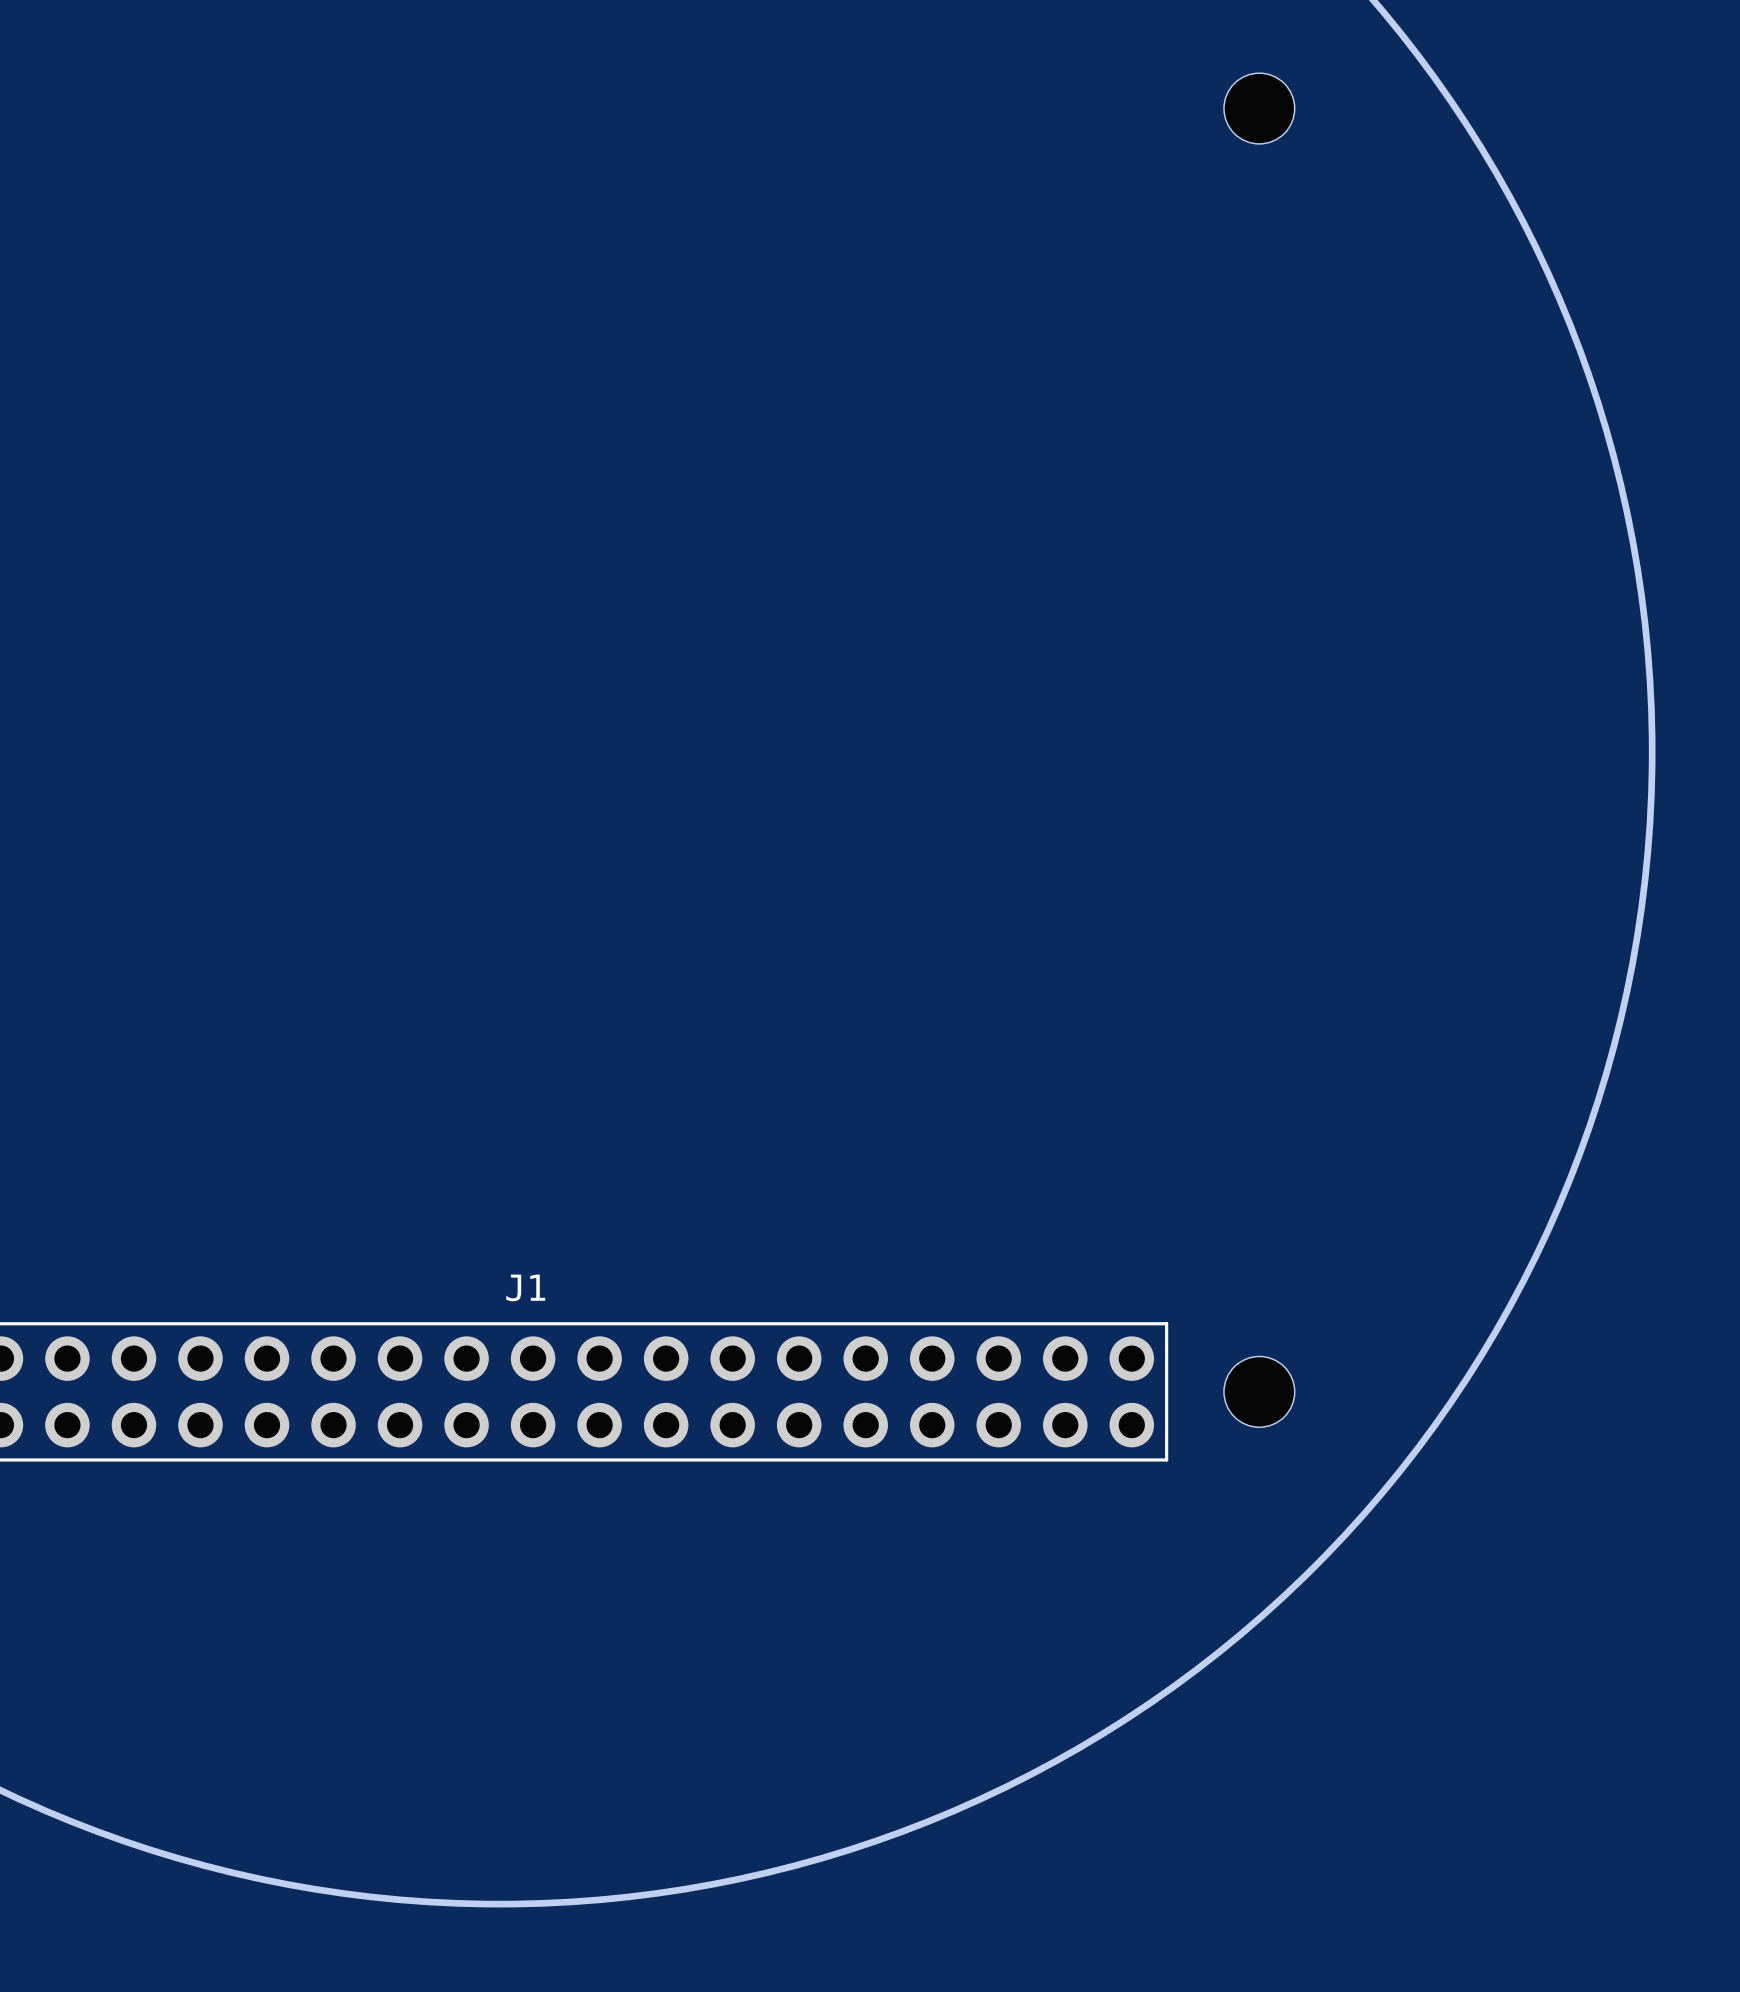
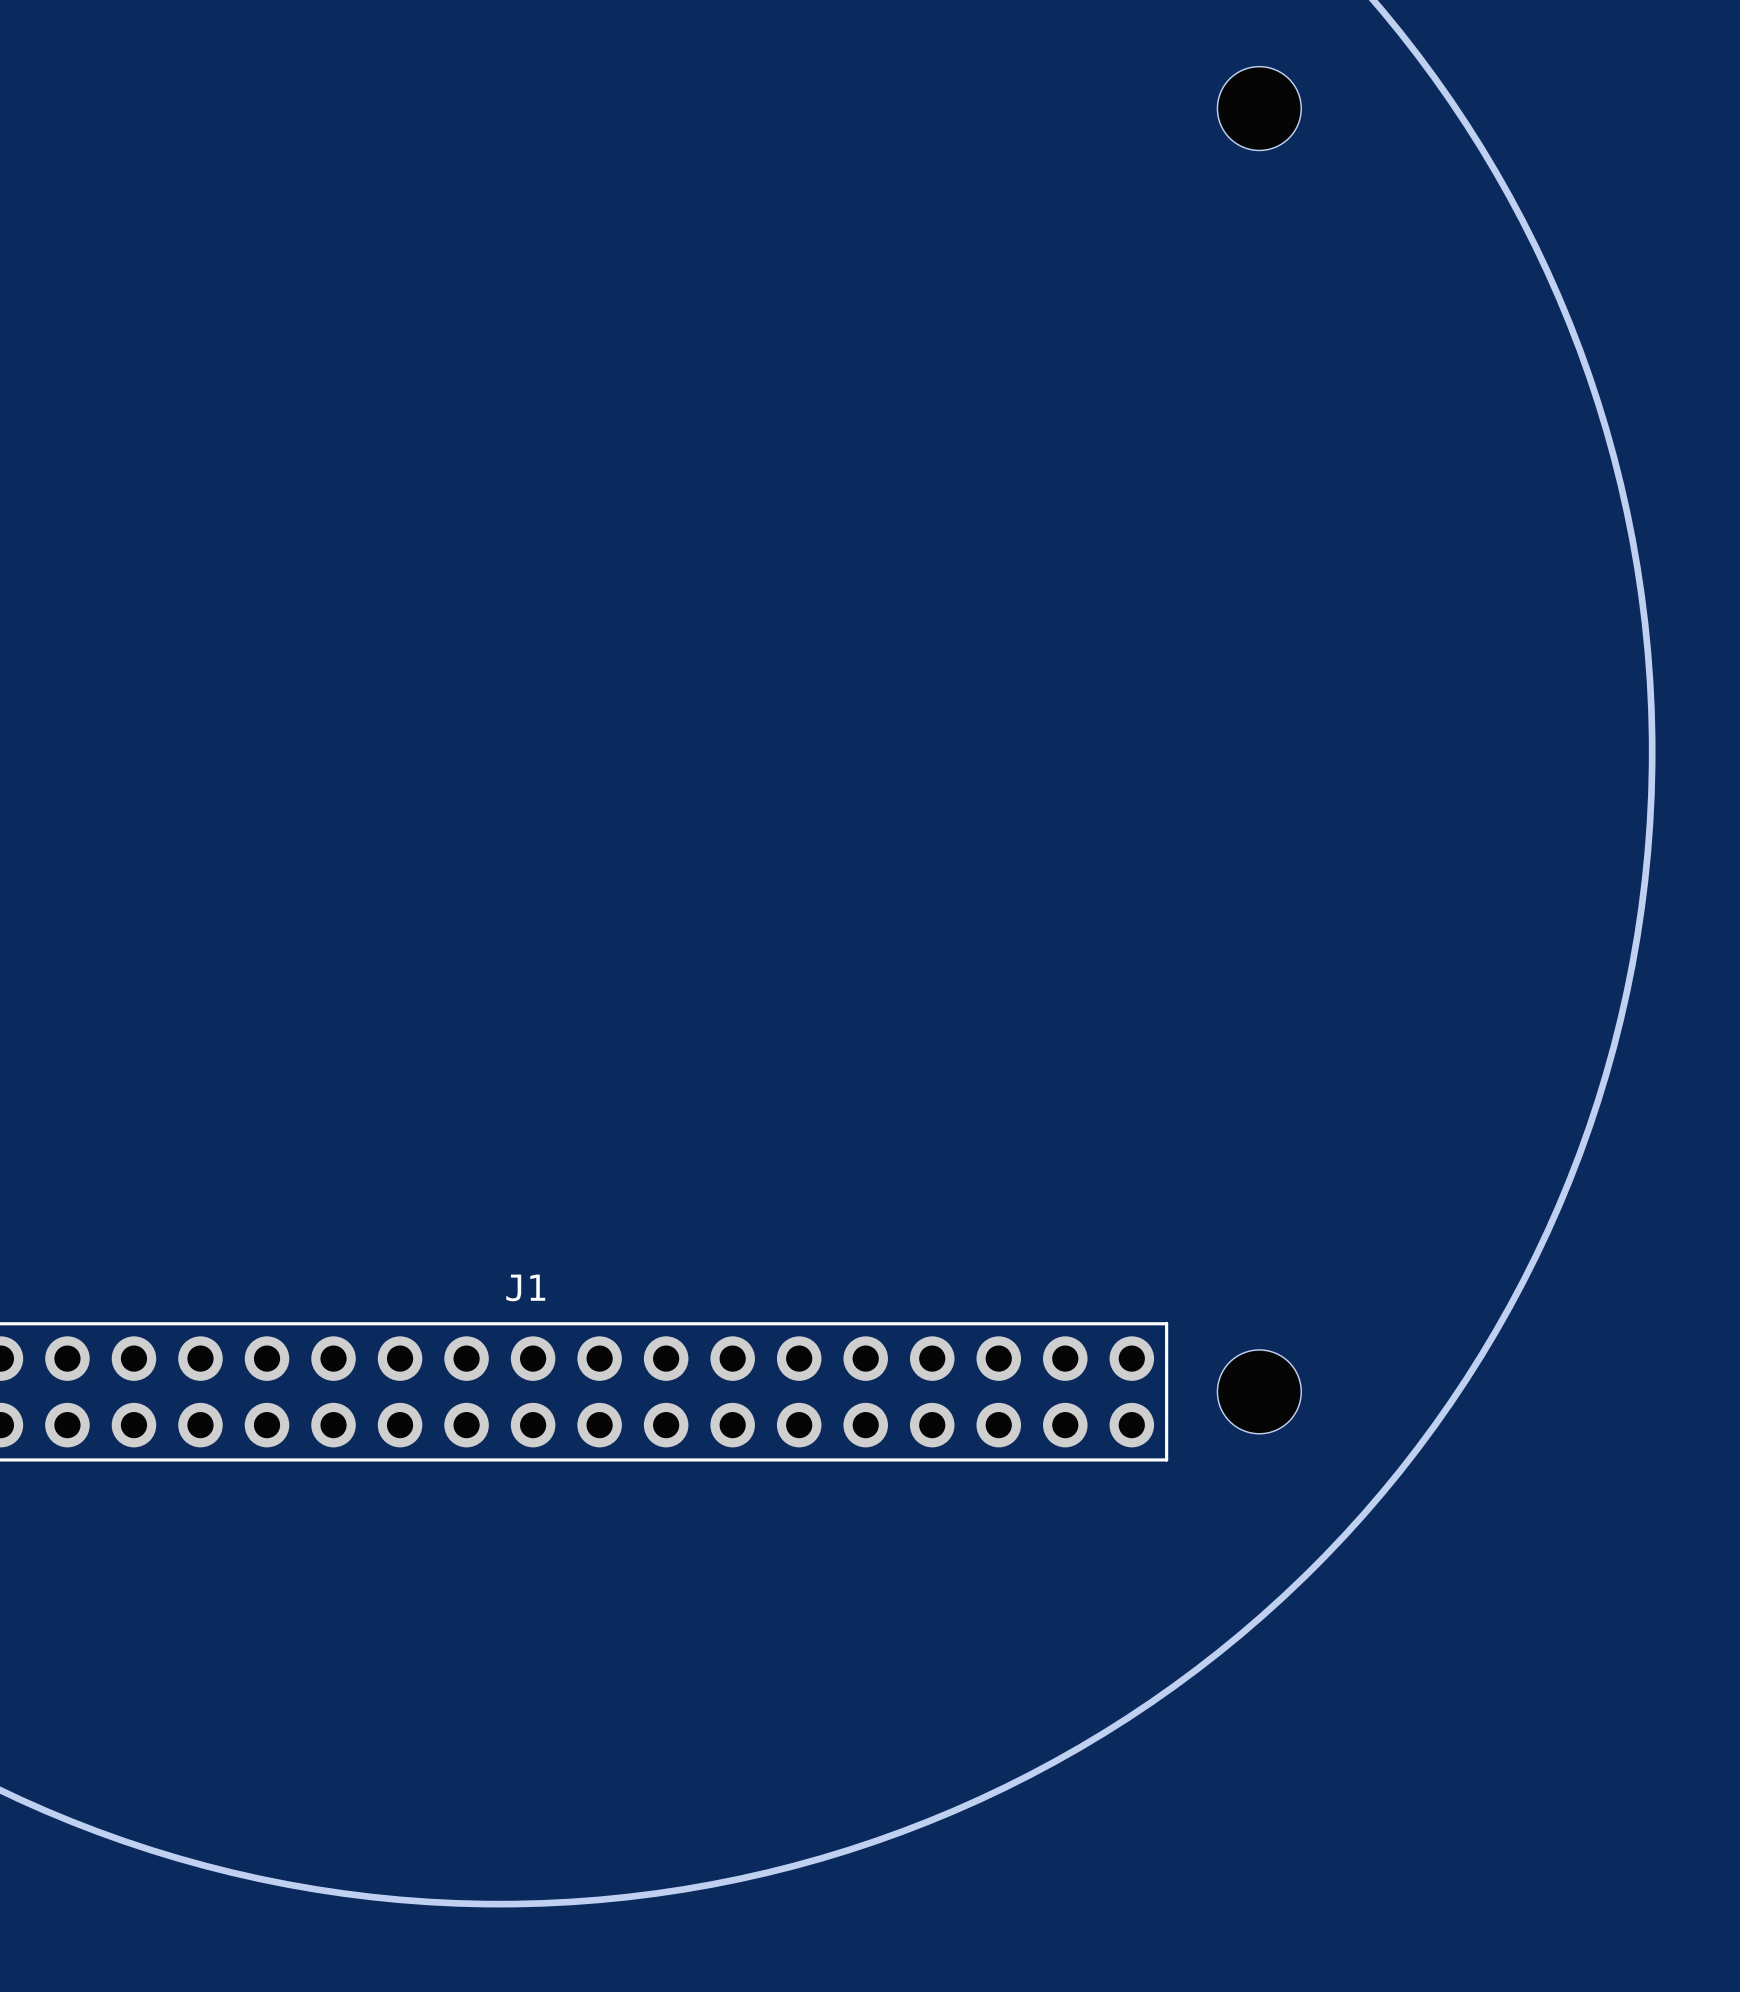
part footprint: [1223, 73, 1295, 144] -> [1217, 66, 1302, 151]
part footprint: [1223, 1356, 1295, 1428] -> [1217, 1349, 1302, 1434]

